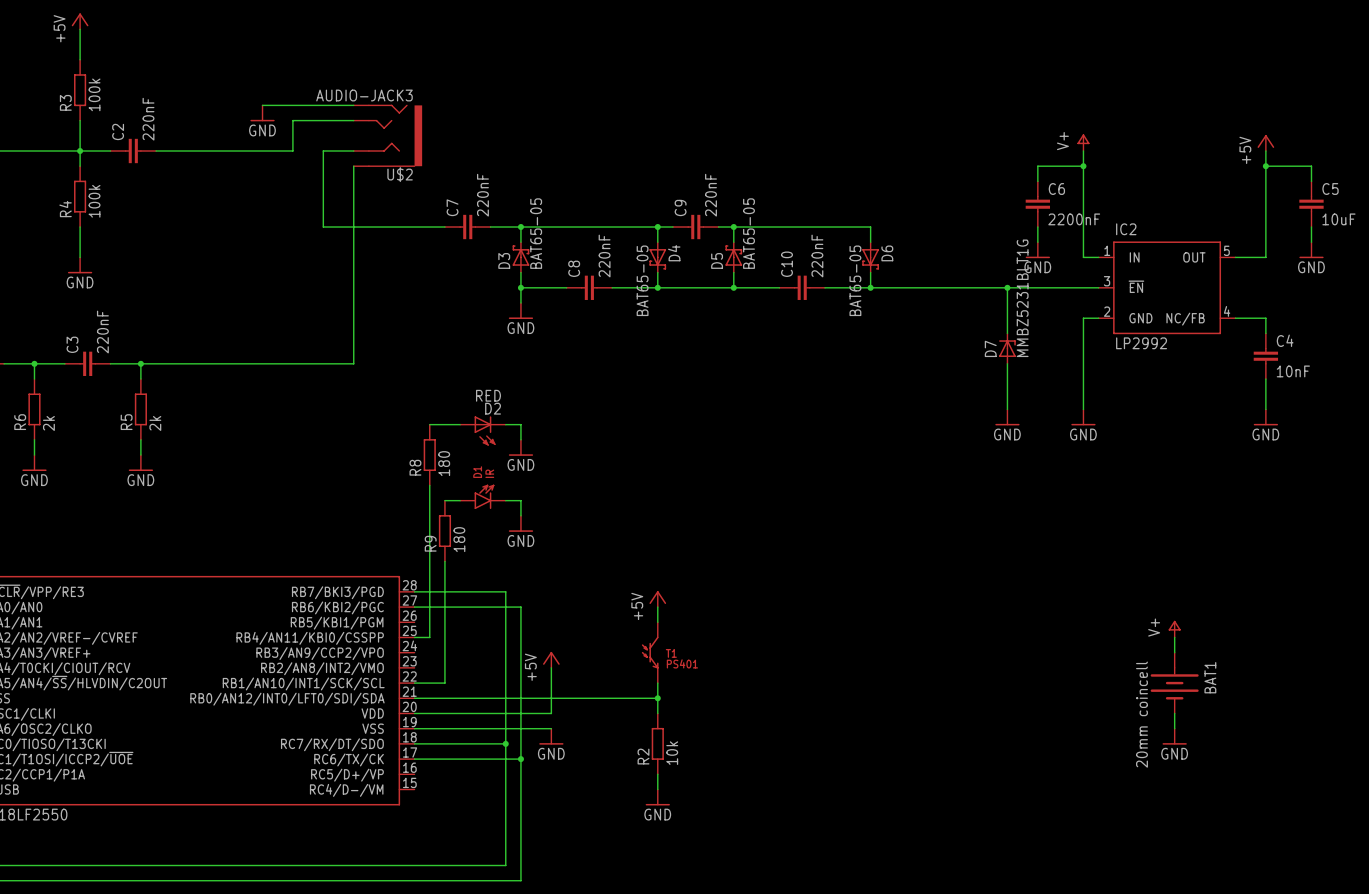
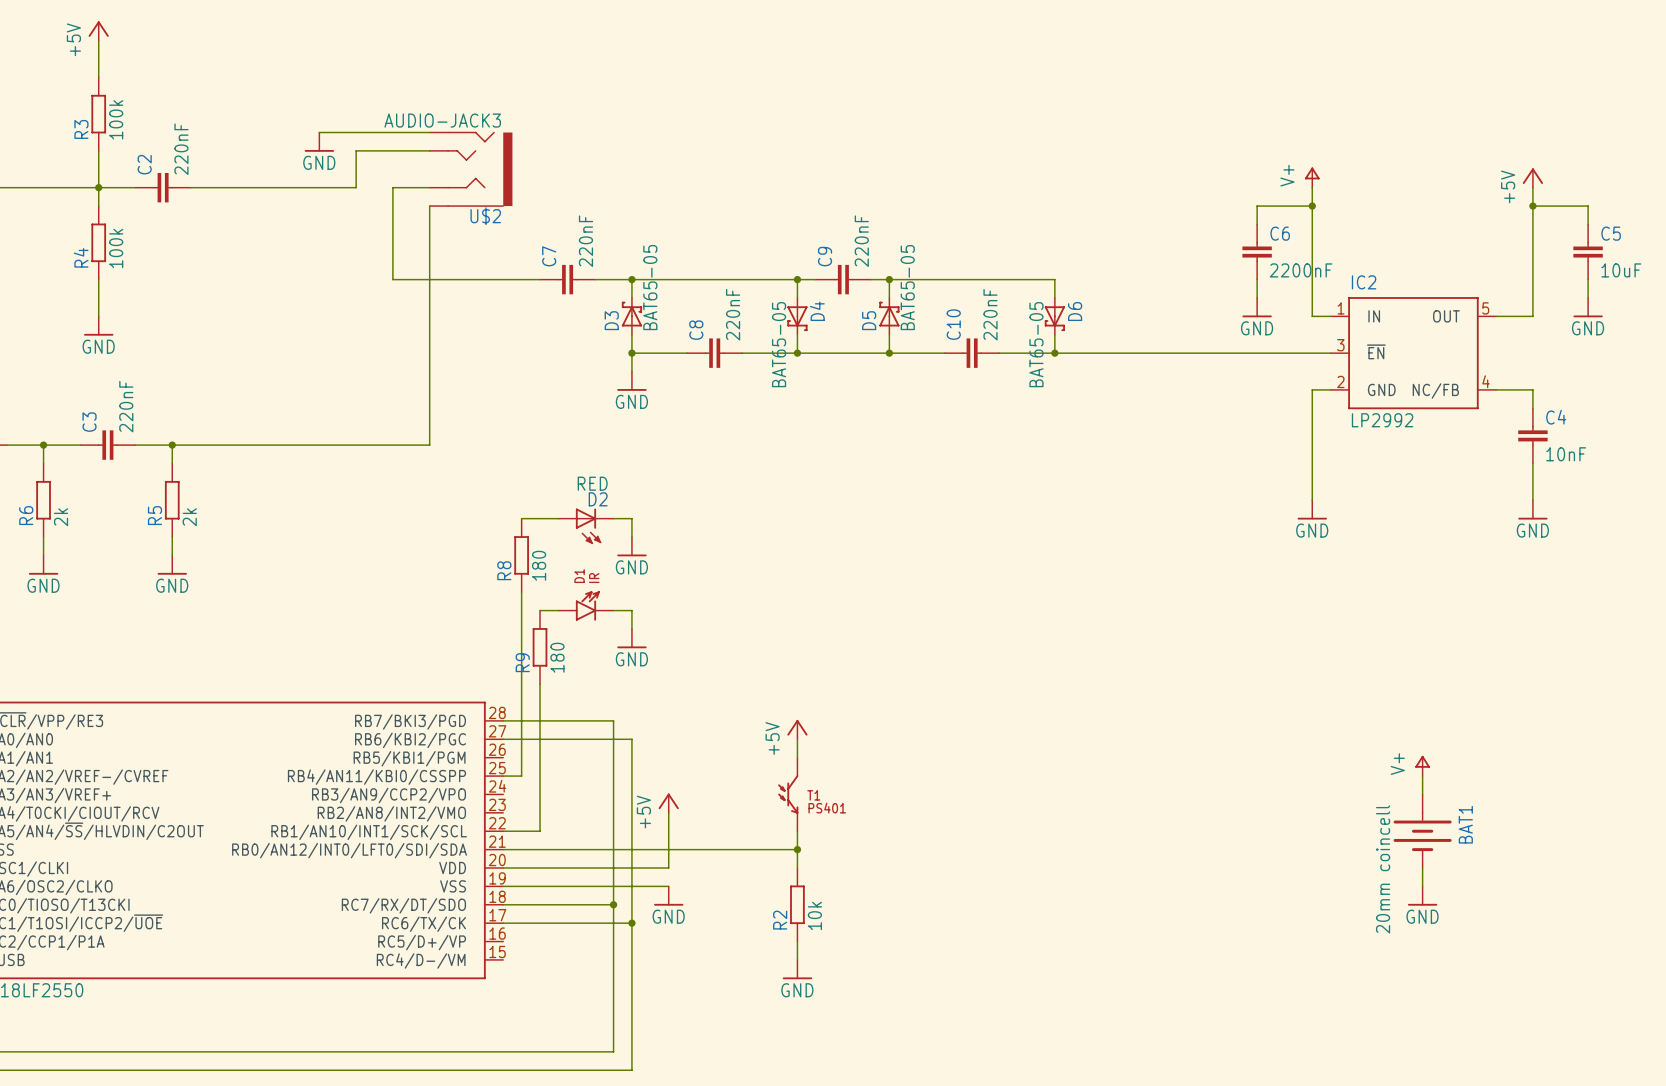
wire: (1007, 287) (1007, 333) -> none
junction: (1007, 287) -> none
D7: MMBZ5231BLT1G (1007, 348) -> none
wire: (1007, 363) (1007, 409) -> none
power symbol: GND (1007, 417) -> none

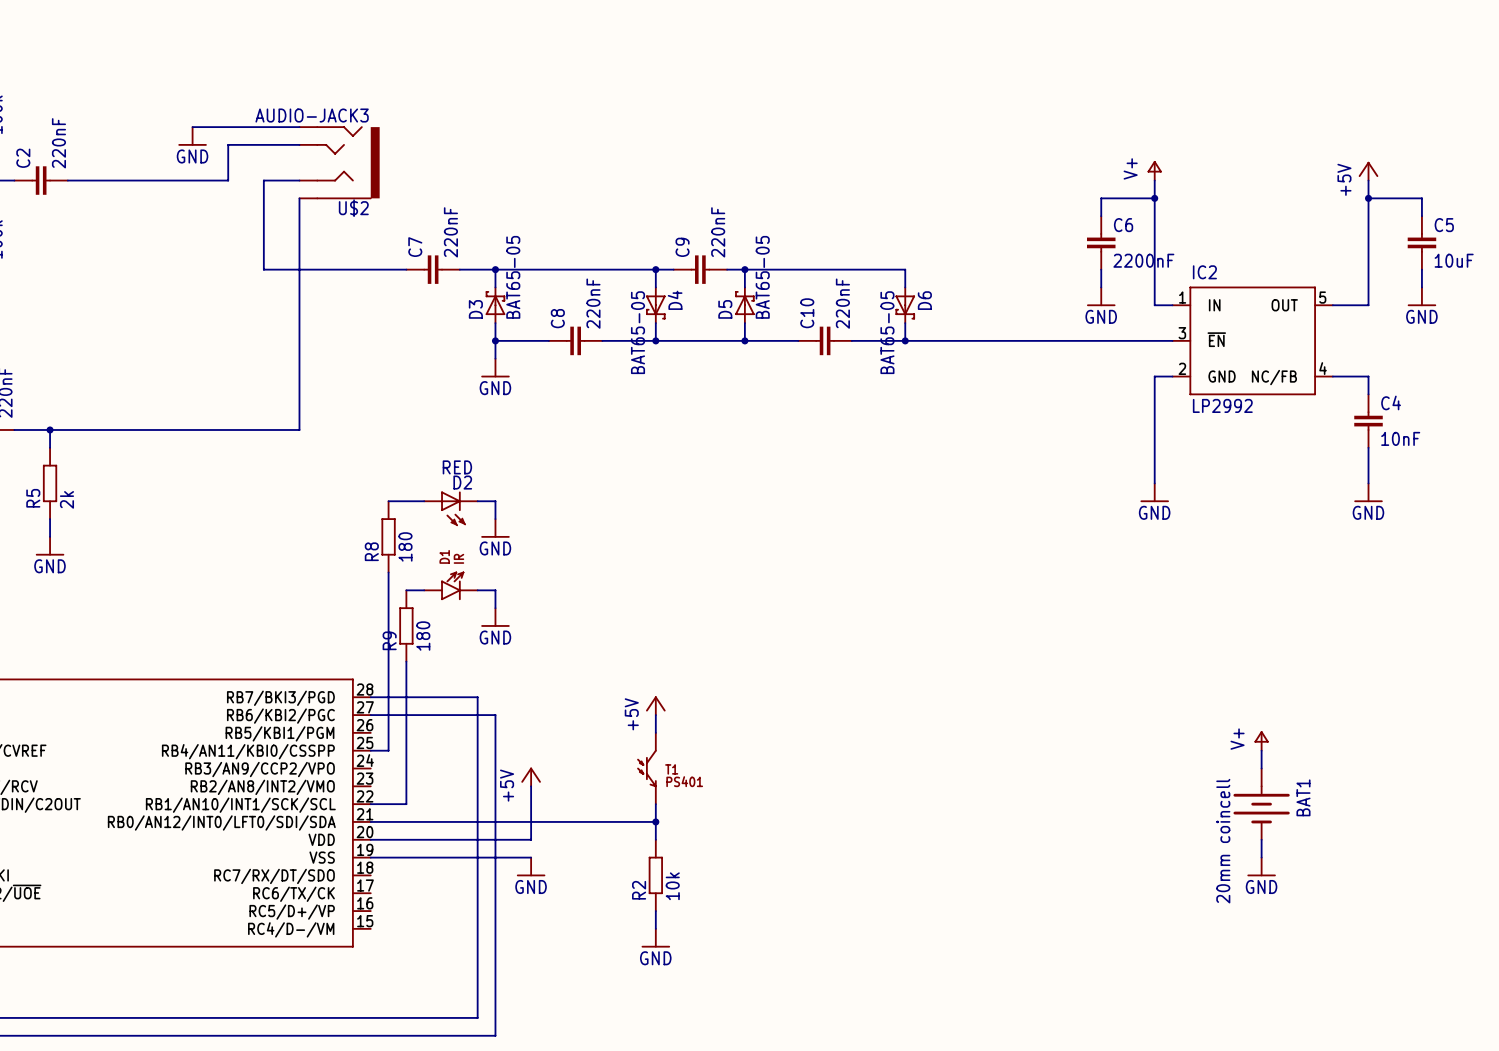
wire: (503, 904) (613, 904) -> none
junction: (613, 904) -> none
wire: (503, 923) (631, 923) -> none
junction: (631, 923) -> none

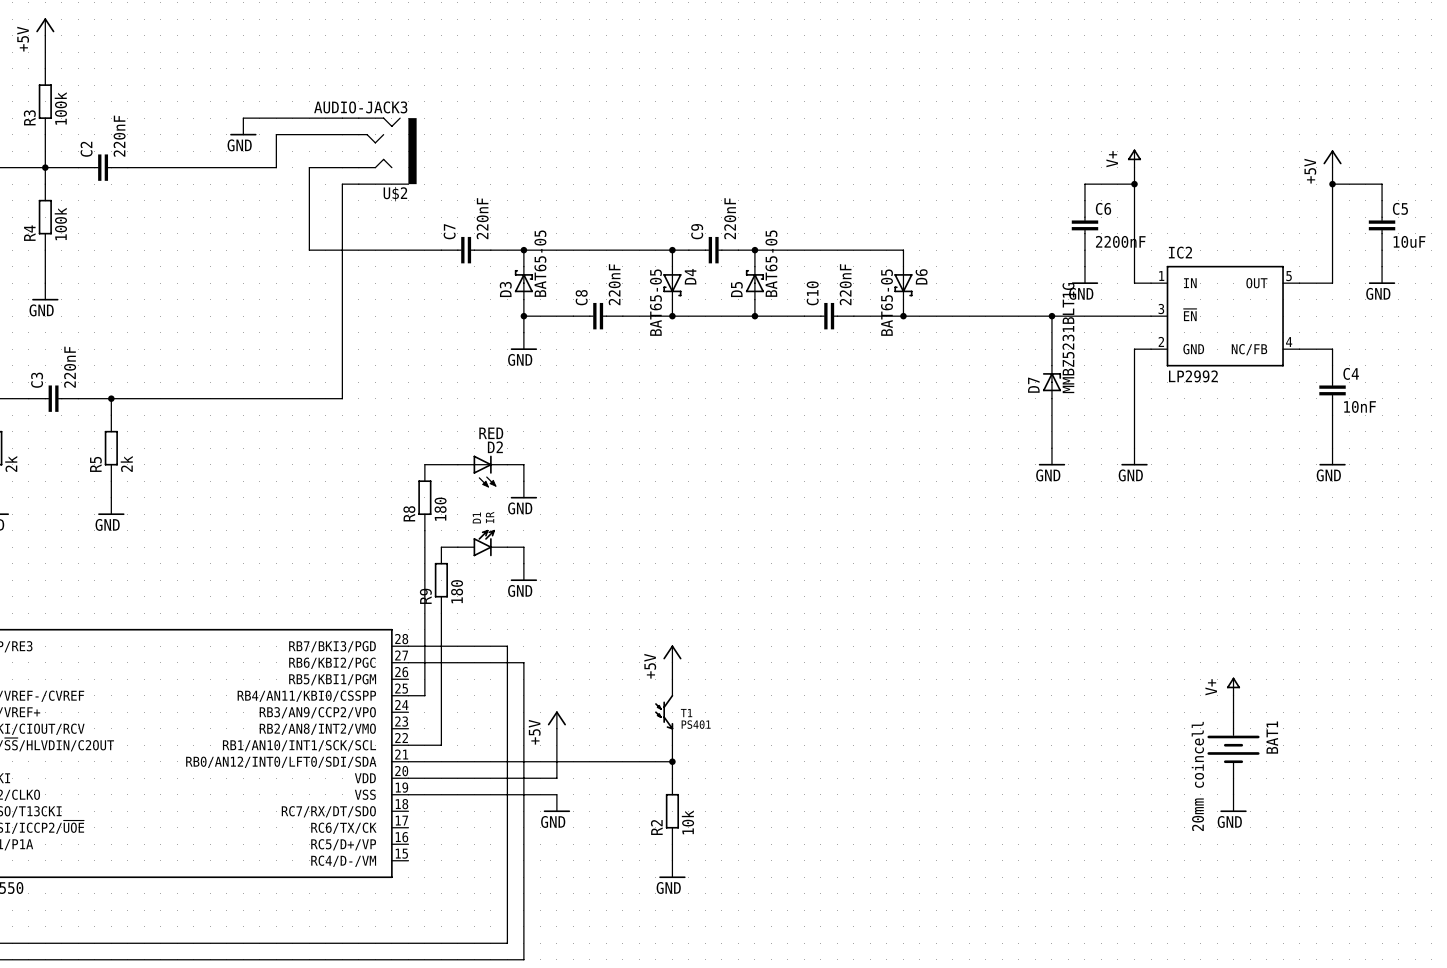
wire: none -> (1051, 316) (1051, 365)
junction: none -> (1051, 316)
D7: none -> MMBZ5231BLT1G (1051, 382)
wire: none -> (1051, 398) (1051, 448)
power symbol: none -> GND (1051, 456)

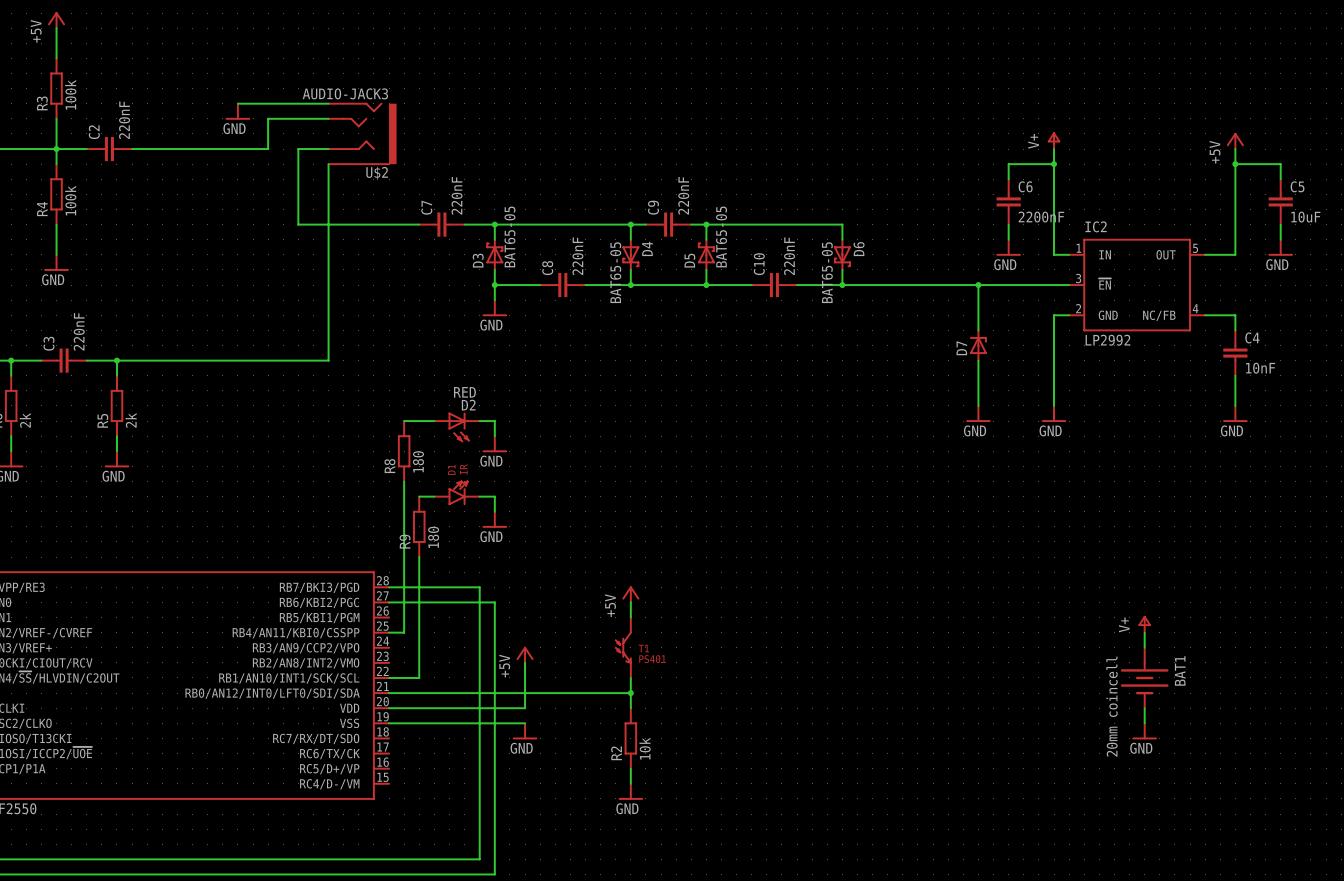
D7 value: MMBZ5231BLT1G (1068, 338) -> none

